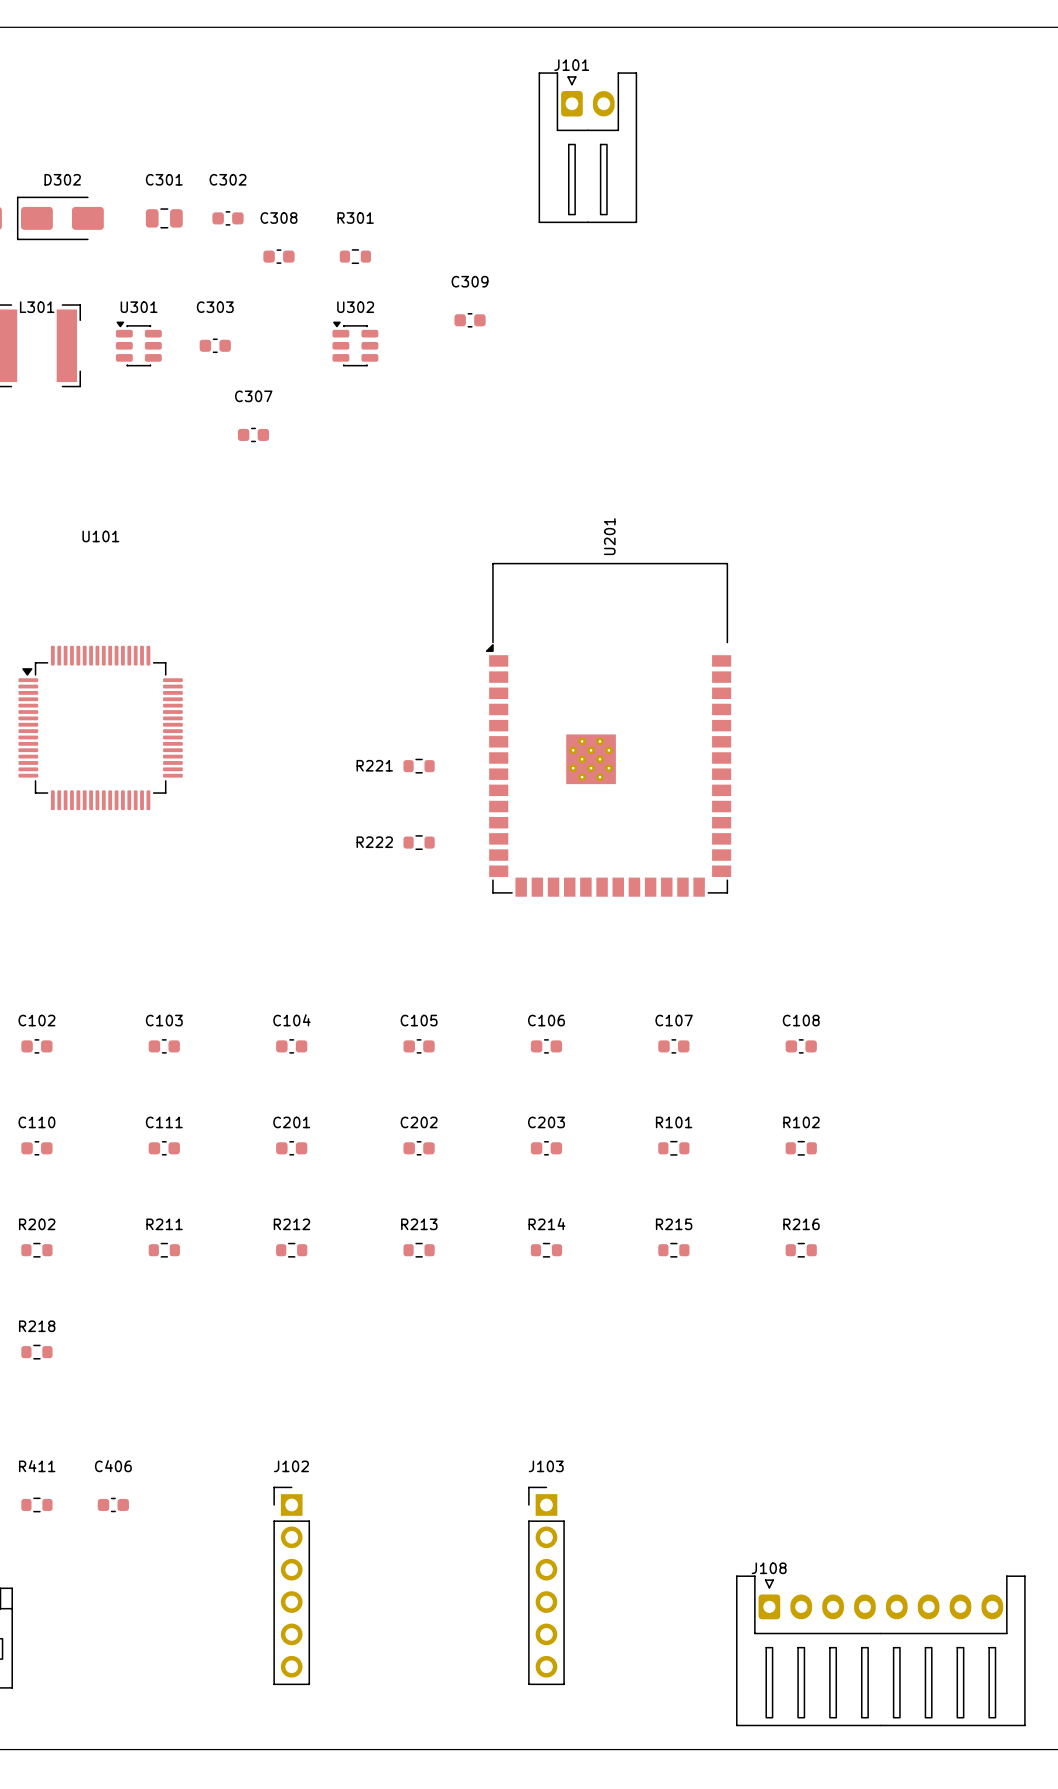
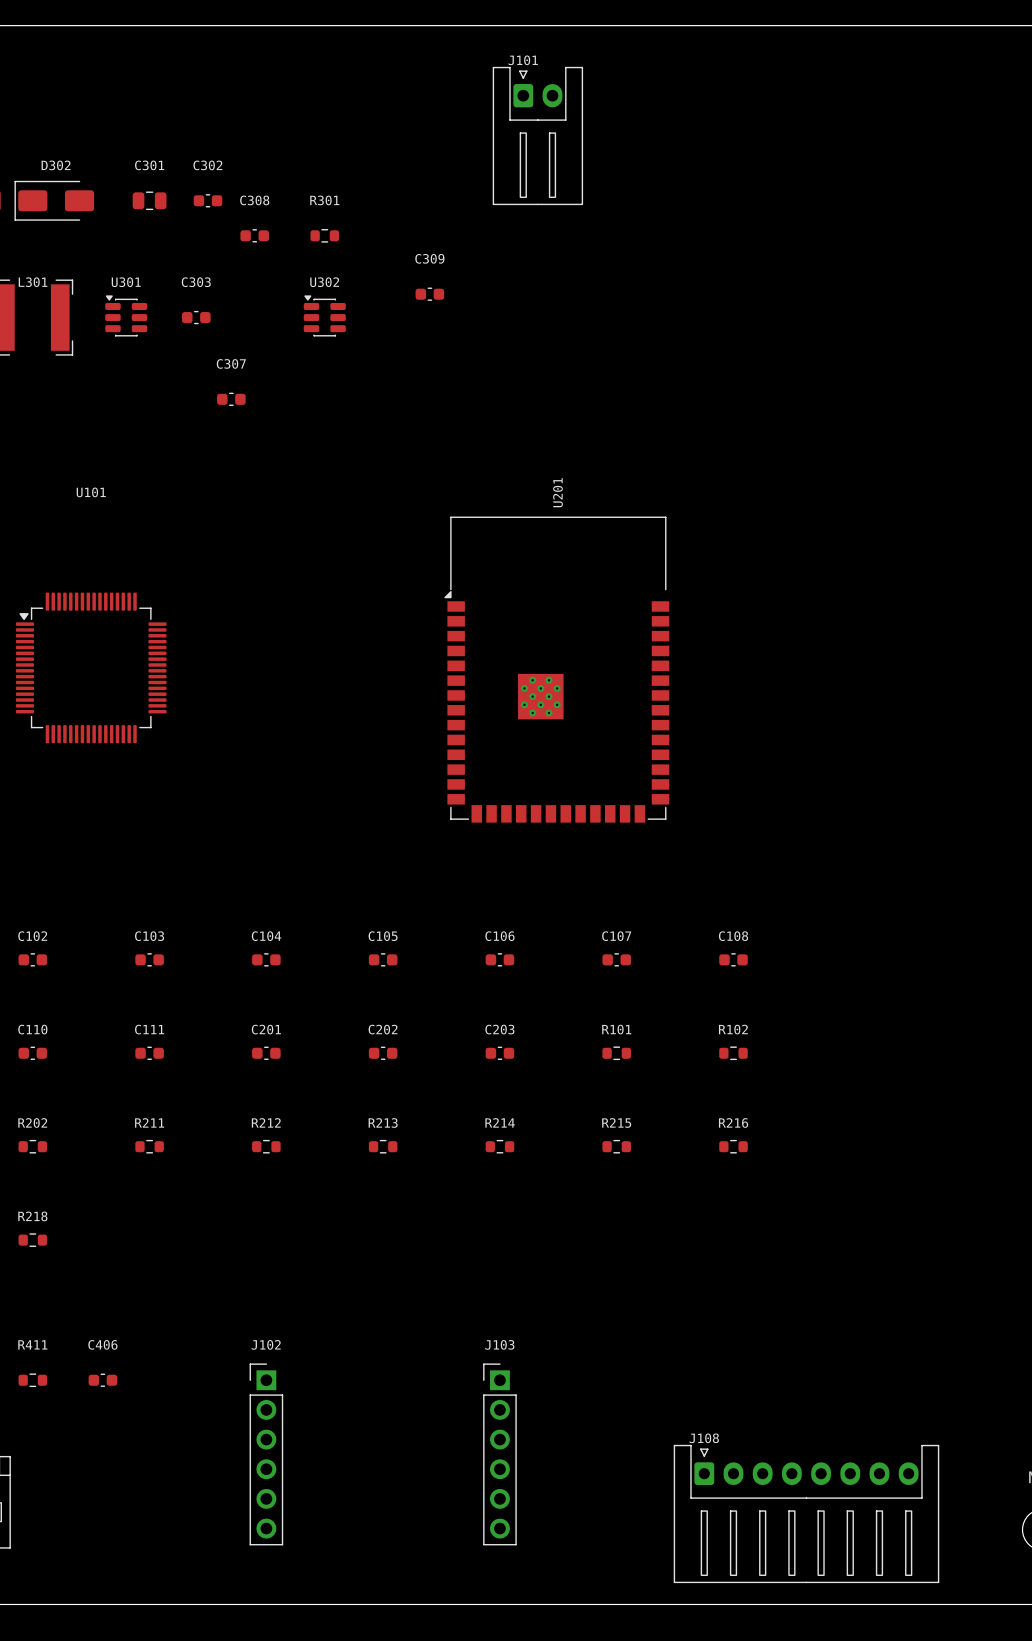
R221: (419, 766) -> none
R222: (419, 842) -> none

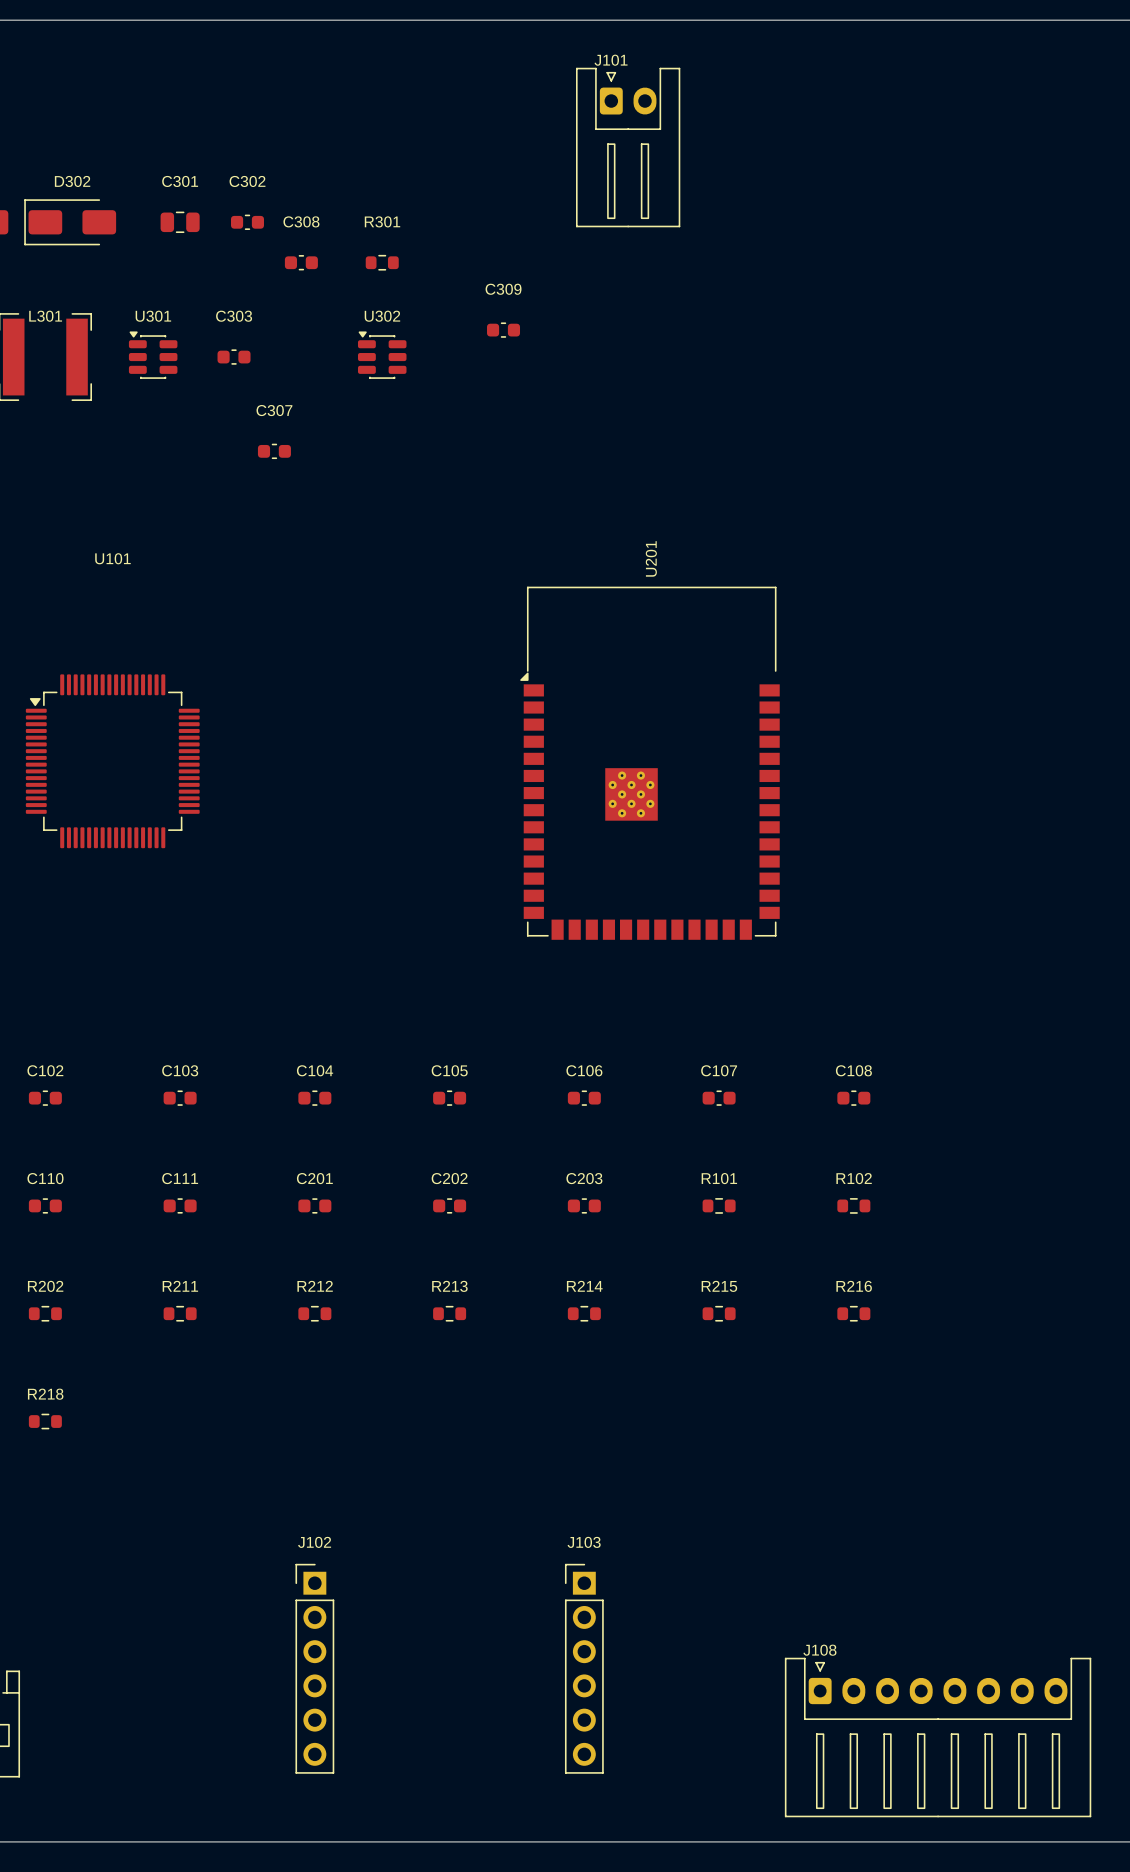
R411: (32, 1380) -> none
C406: (102, 1380) -> none

